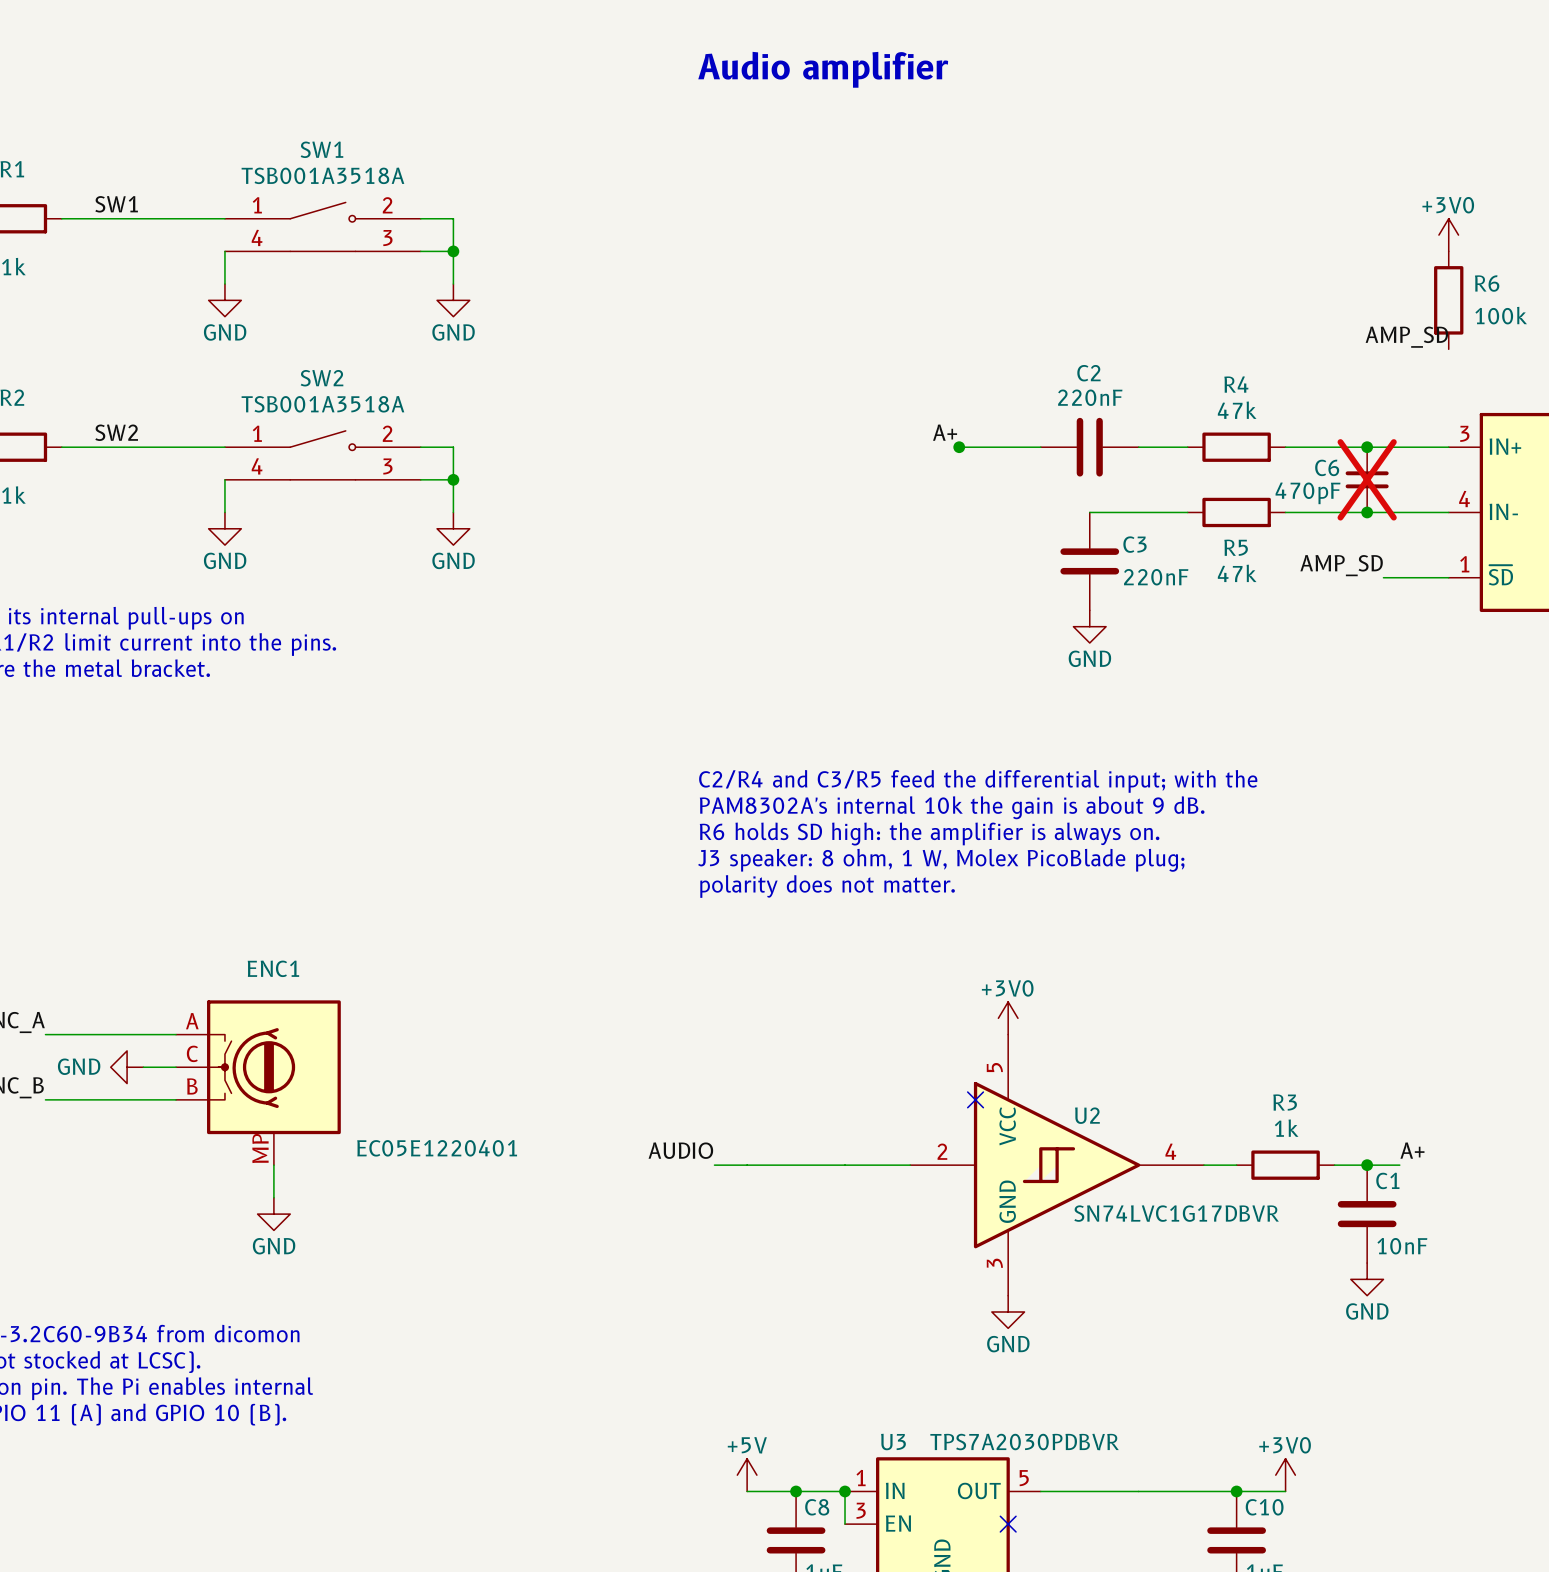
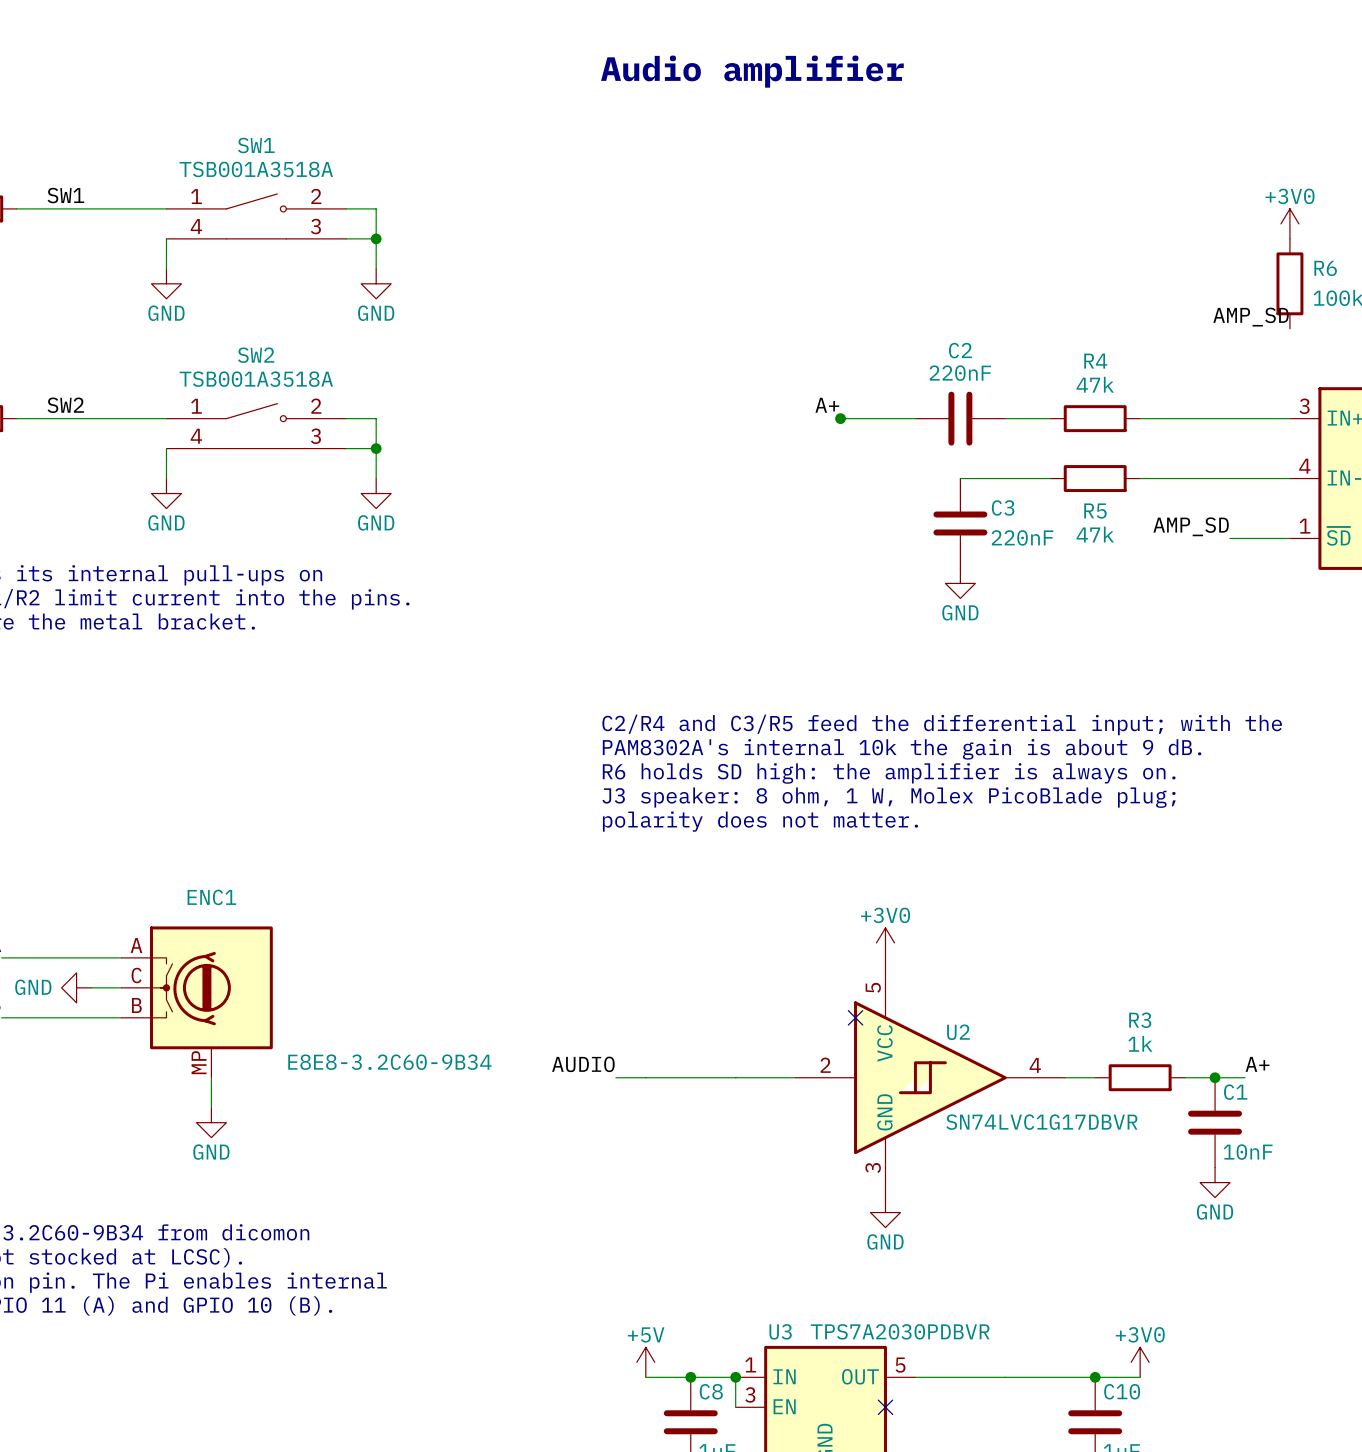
junction: (1367, 447) -> none
C6: 470pF (1367, 479) -> none
junction: (1367, 512) -> none
ENC1 value: EC05E1220401 (437, 1148) -> E8E8-3.2C60-9B34 (389, 1062)

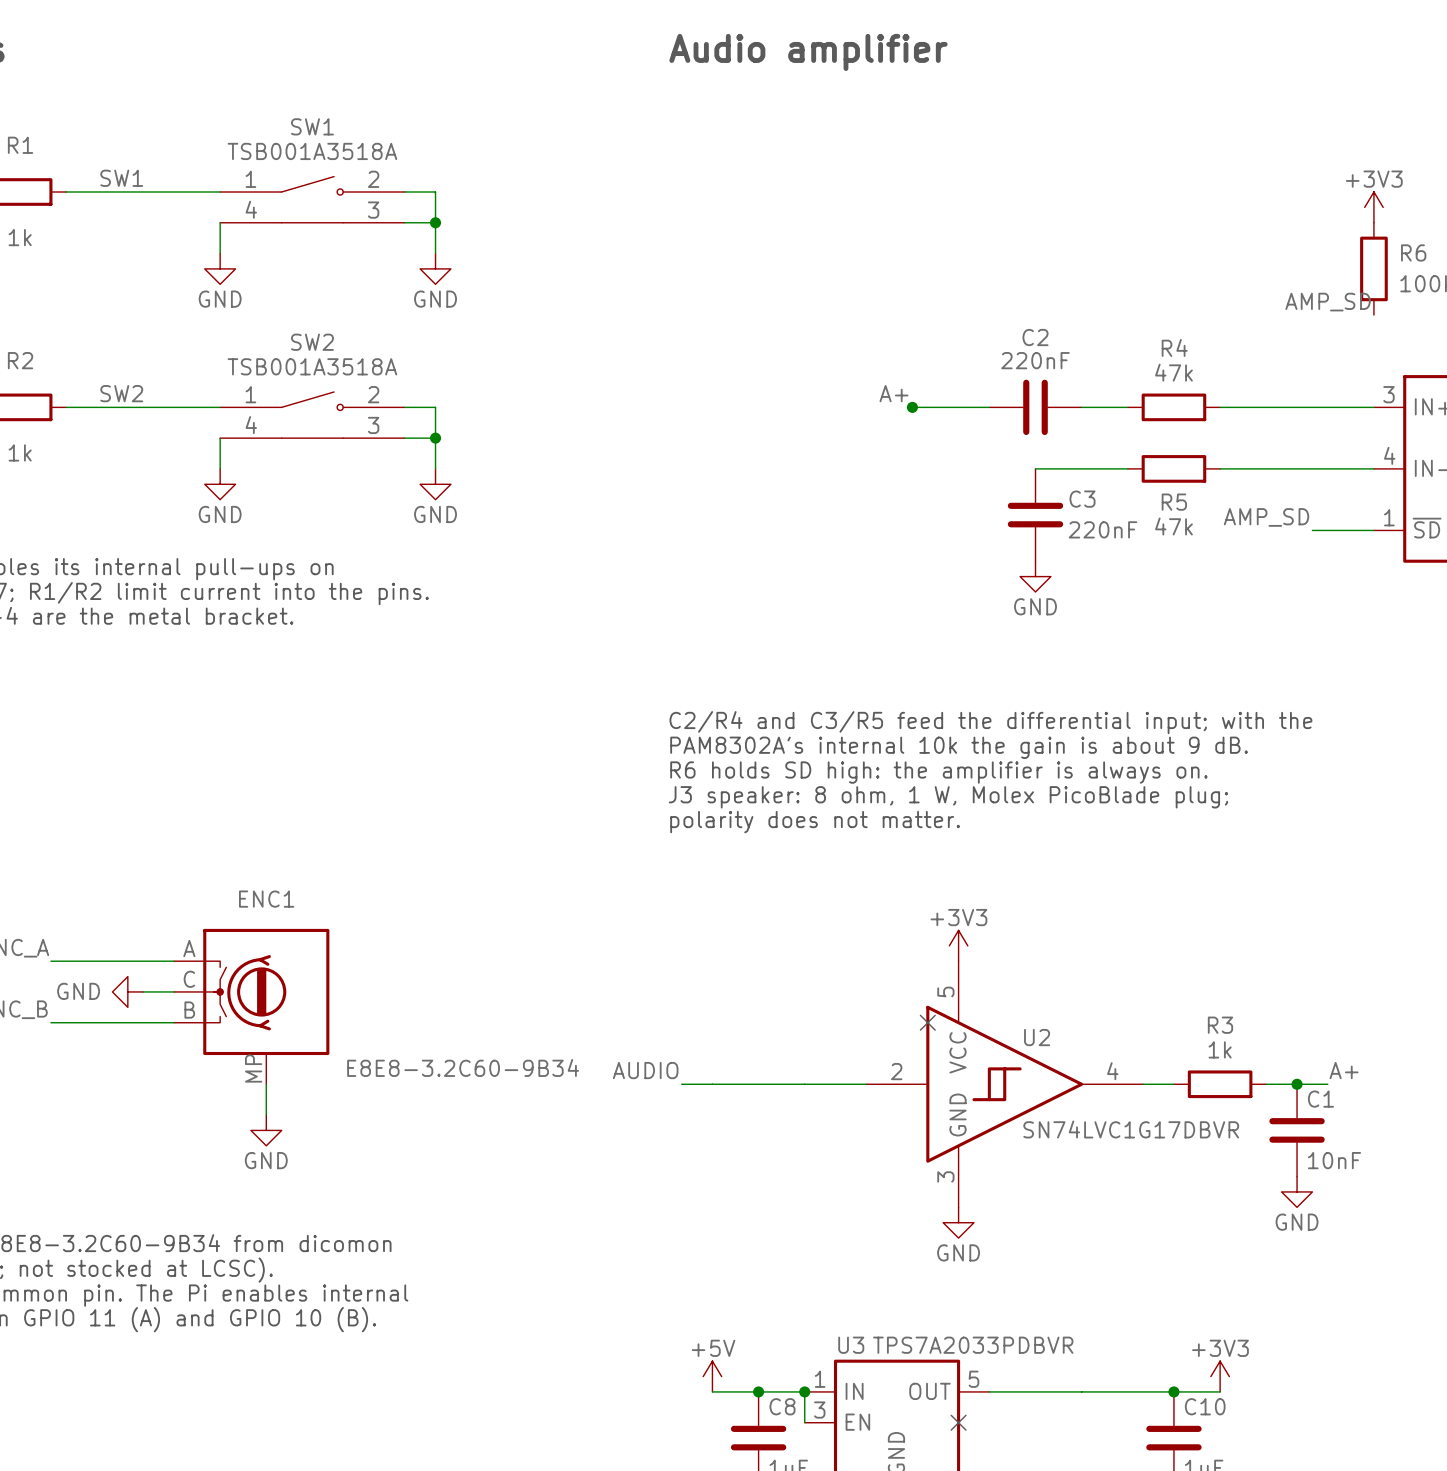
power symbol: +3V0 (1289, 223) -> +3V3 (1373, 207)
power symbol: +3V0 (885, 942) -> +3V3 (958, 945)
U3 value: TPS7A2030PDBVR (900, 1331) -> TPS7A2033PDBVR (973, 1345)
power symbol: +3V0 (1140, 1362) -> +3V3 (1220, 1376)

